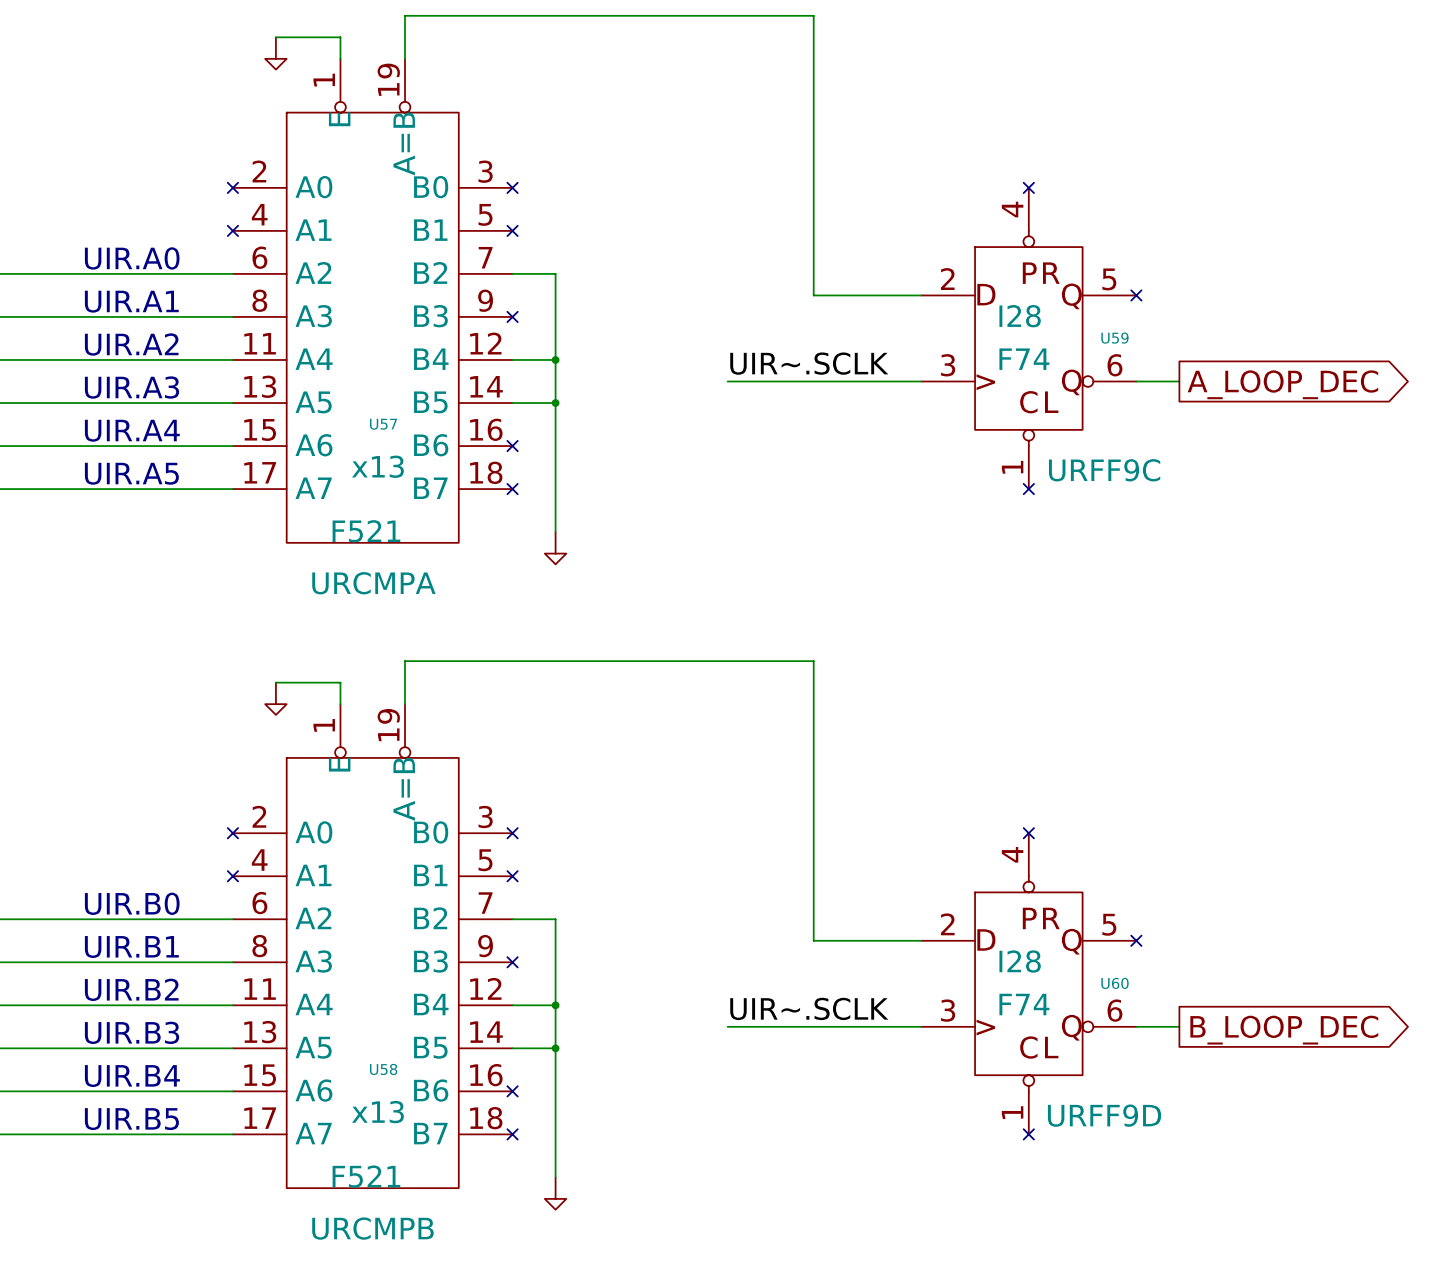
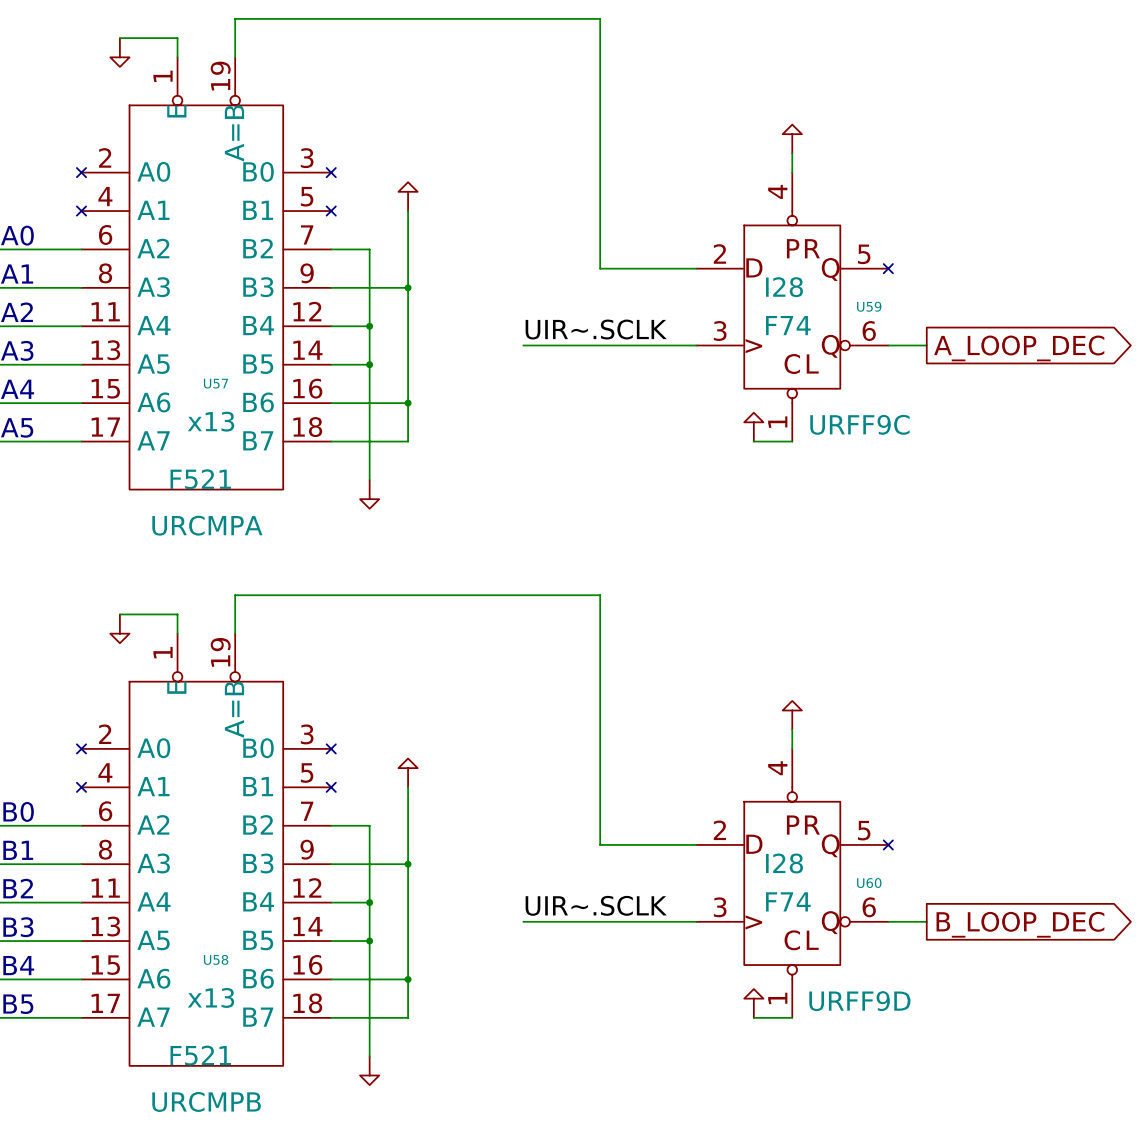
power symbol: none -> (792, 138)
wire: none -> (792, 153) (792, 172)
no-connect mark: (1028, 187) -> none
power symbol: none -> (408, 196)
wire: none -> (408, 211) (408, 441) (331, 441)
wire: none -> (331, 287) (408, 287)
no-connect mark: (512, 316) -> none
junction: none -> (408, 287)
wire: none -> (331, 403) (408, 403)
no-connect mark: (512, 446) -> none
junction: none -> (408, 403)
power symbol: none -> (753, 426)
no-connect mark: (512, 489) -> none
wire: none -> (753, 441) (792, 441)
no-connect mark: (1028, 489) -> none
power symbol: none -> (792, 715)
wire: none -> (792, 729) (792, 748)
no-connect mark: (1028, 833) -> none
power symbol: none -> (408, 772)
wire: none -> (408, 787) (408, 1017) (331, 1017)
wire: none -> (331, 864) (408, 864)
no-connect mark: (512, 962) -> none
junction: none -> (408, 864)
wire: none -> (331, 979) (408, 979)
no-connect mark: (512, 1091) -> none
junction: none -> (408, 979)
power symbol: none -> (753, 1003)
no-connect mark: (512, 1134) -> none
wire: none -> (753, 1017) (792, 1017)
no-connect mark: (1028, 1134) -> none

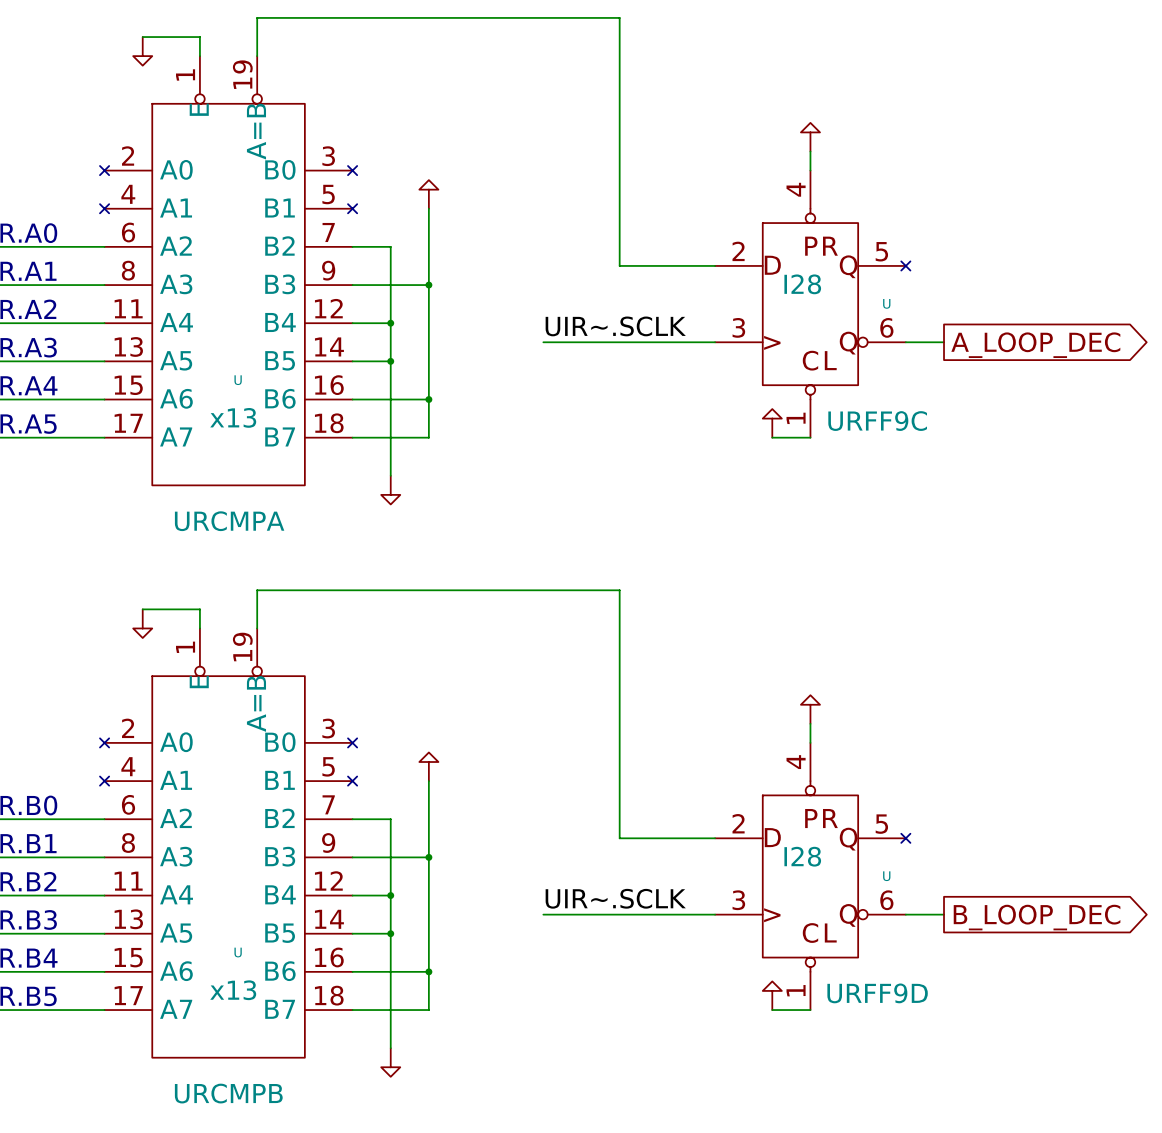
U59 name: U59 (869, 306) -> U (886, 303)
U59 value: F74 (788, 325) -> none
U57 name: U57 (215, 383) -> U (238, 380)
U57 value: F521 (200, 479) -> none
U60 name: U60 (869, 883) -> U (886, 876)
U60 value: F74 (788, 901) -> none
U58 name: U58 (216, 959) -> U (238, 952)
U58 value: F521 (200, 1055) -> none

